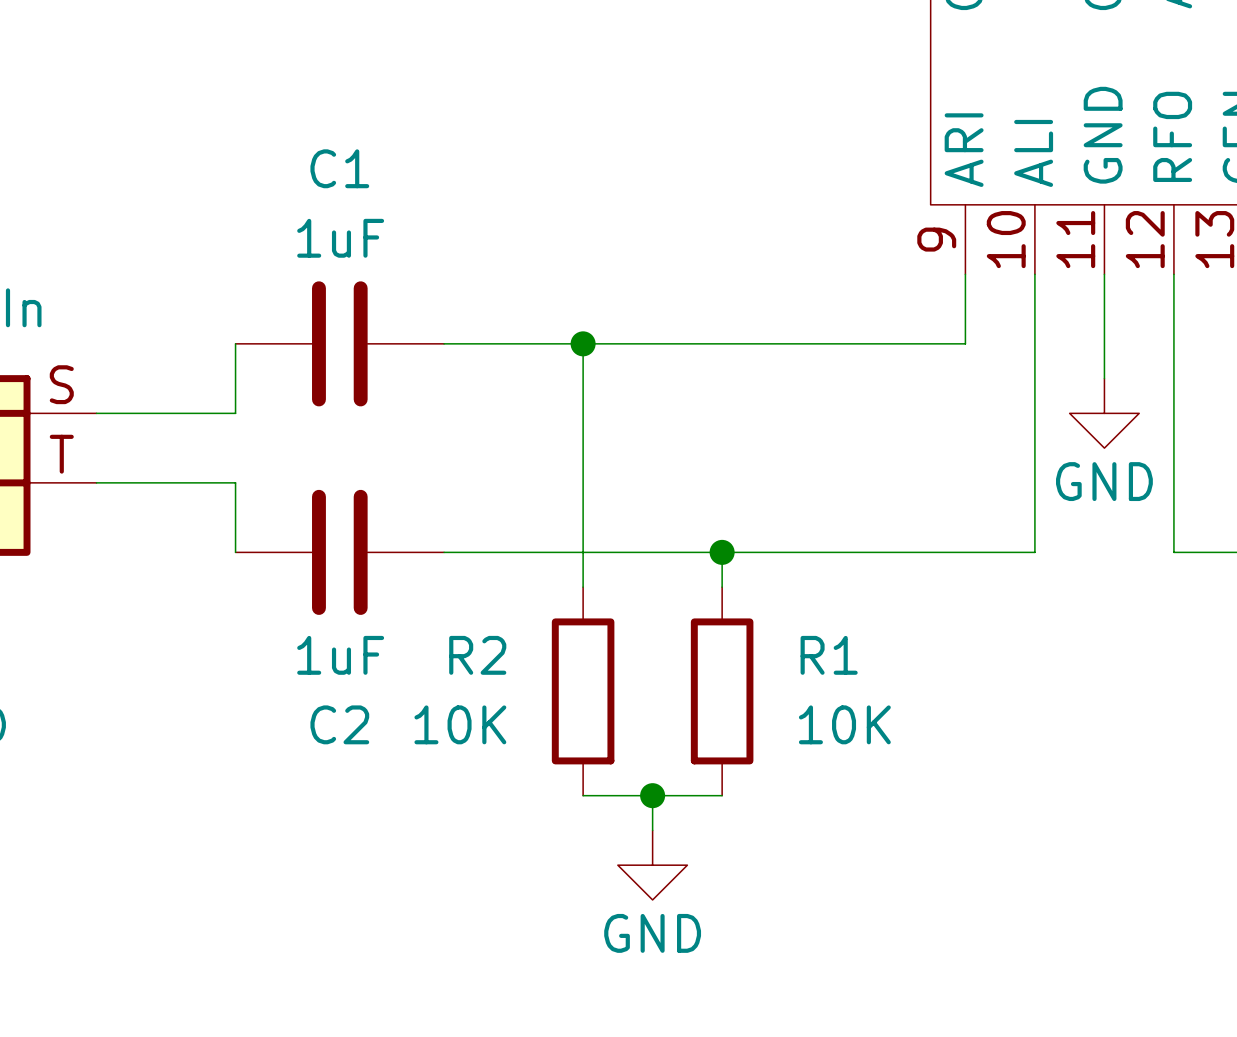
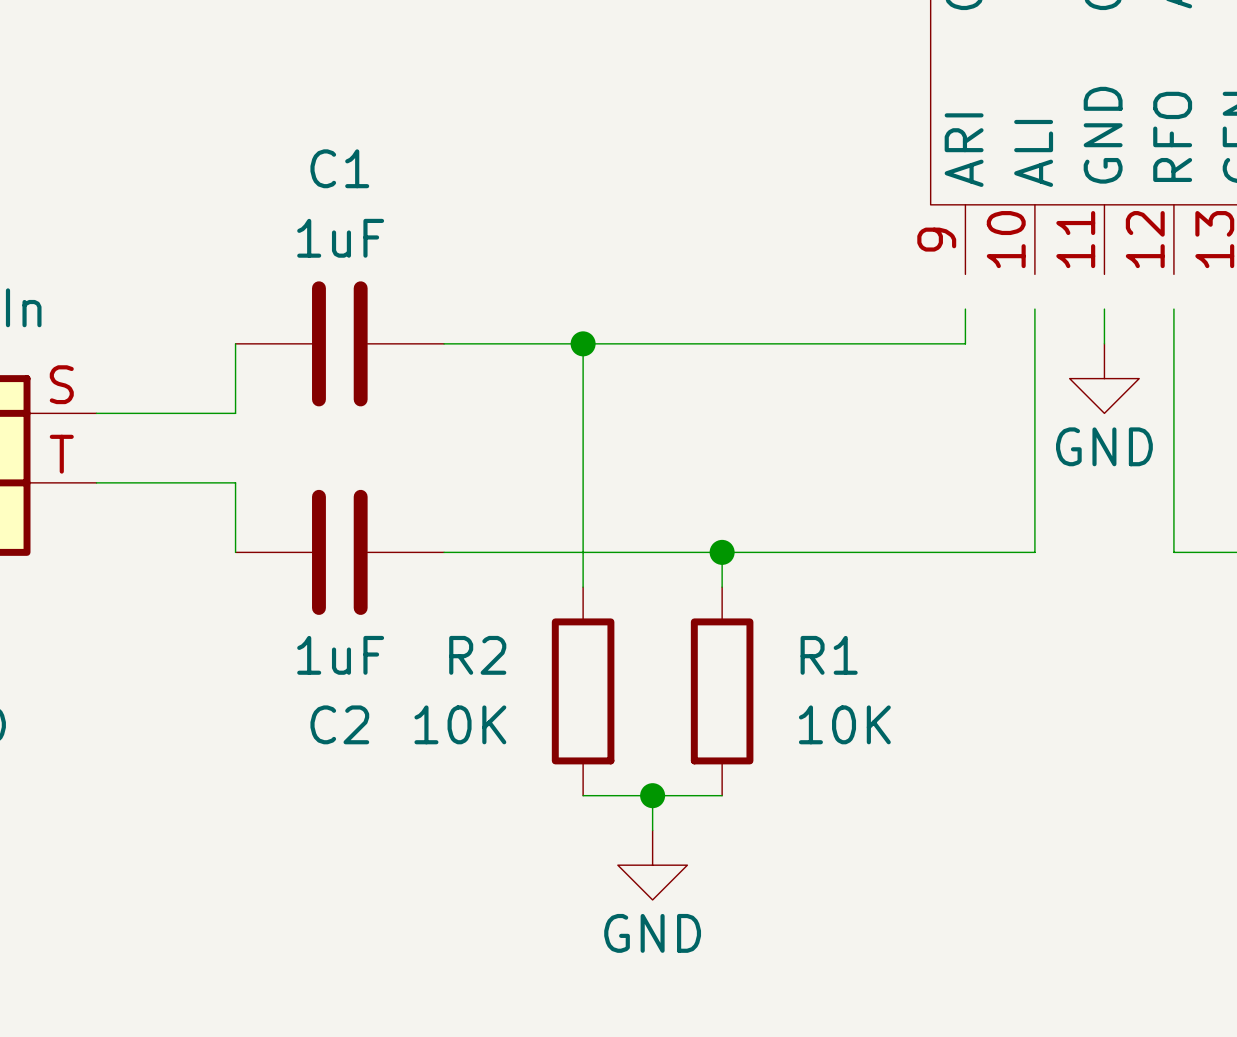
wire: (965, 274) (965, 309) -> none
wire: (1034, 274) (1034, 309) -> none
wire: (1104, 274) (1104, 309) -> none
wire: (1173, 274) (1173, 309) -> none
power symbol position: GND (1104, 413) -> GND (1104, 378)

